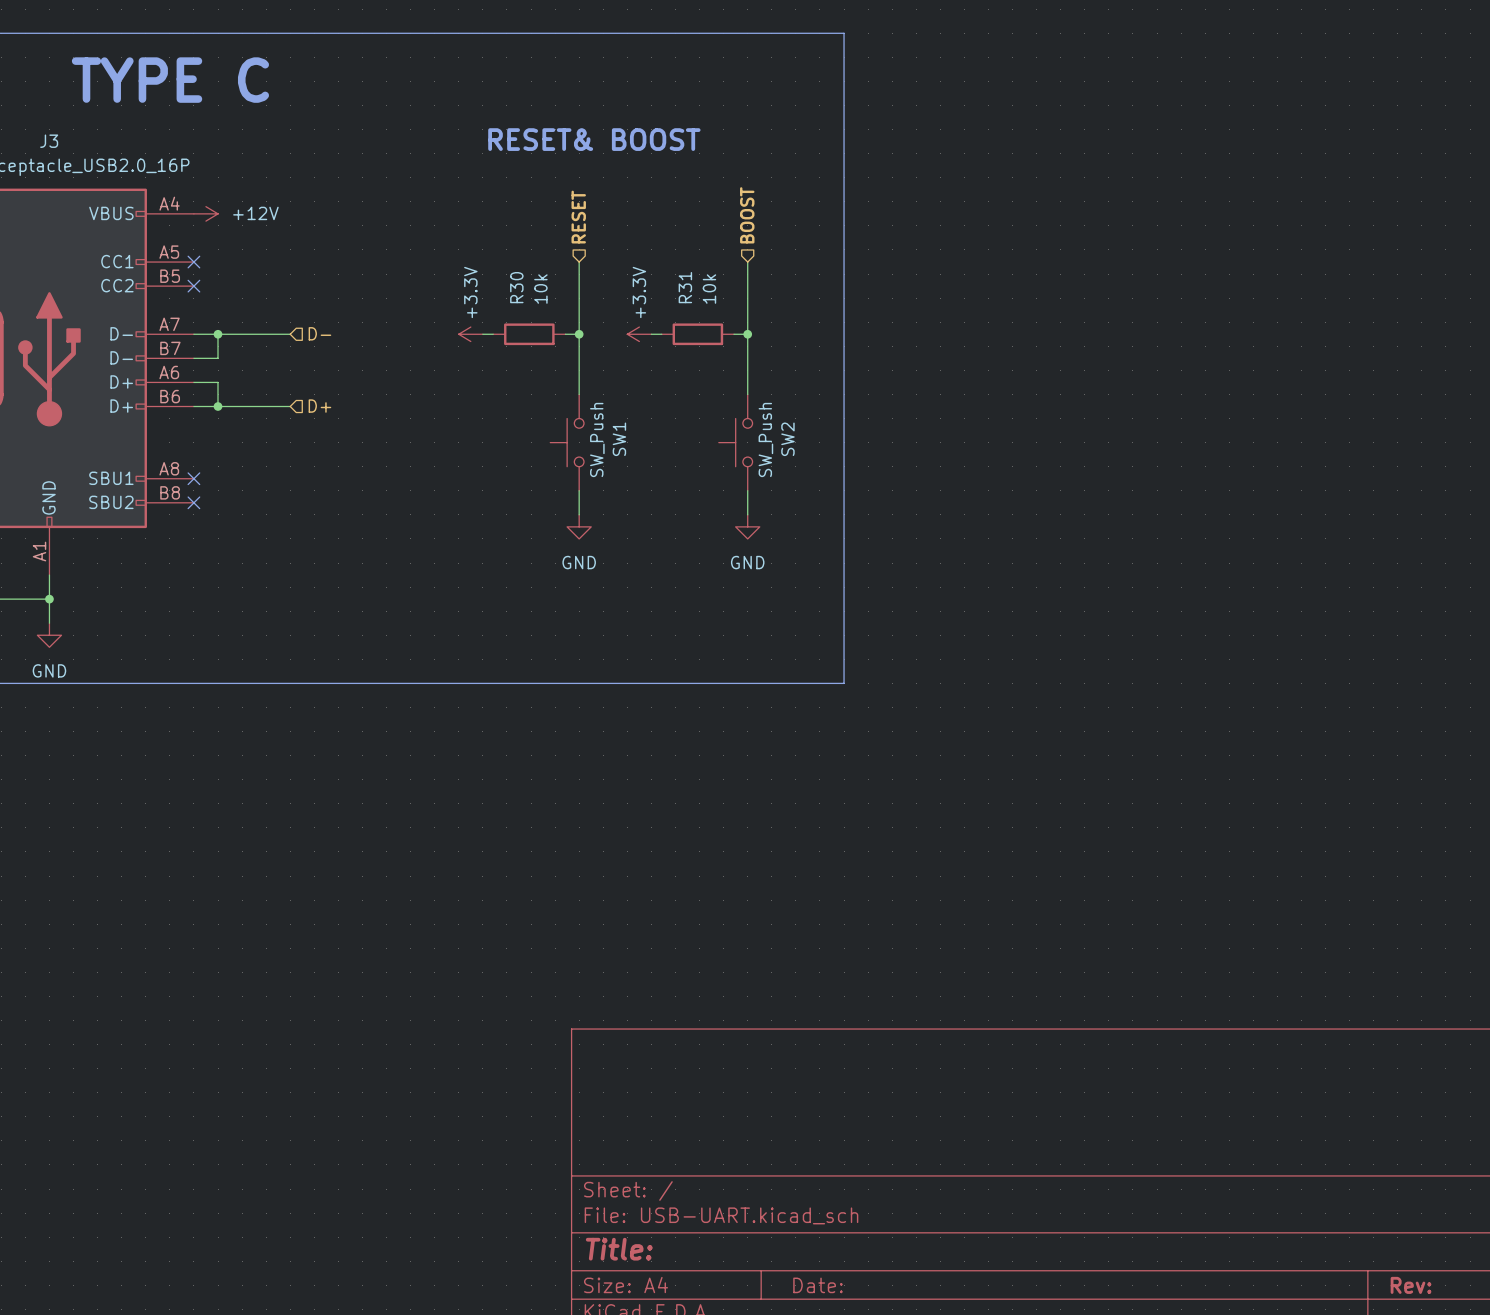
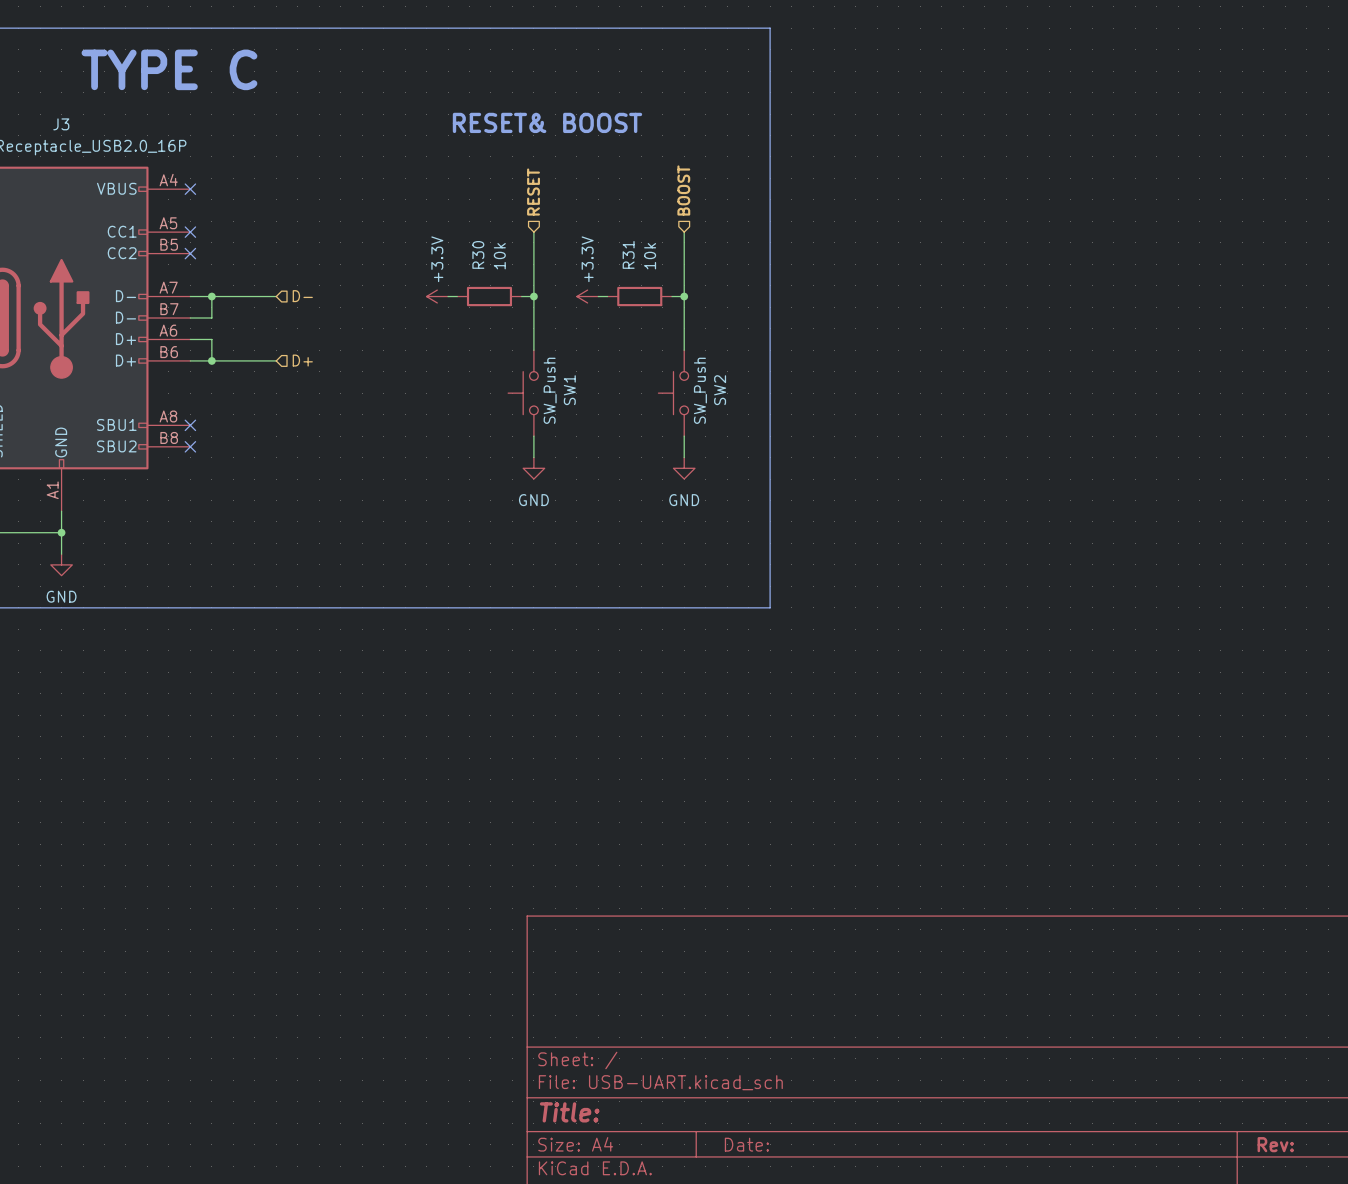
no-connect mark: none -> (190, 189)
power symbol: +12V (205, 213) -> none

